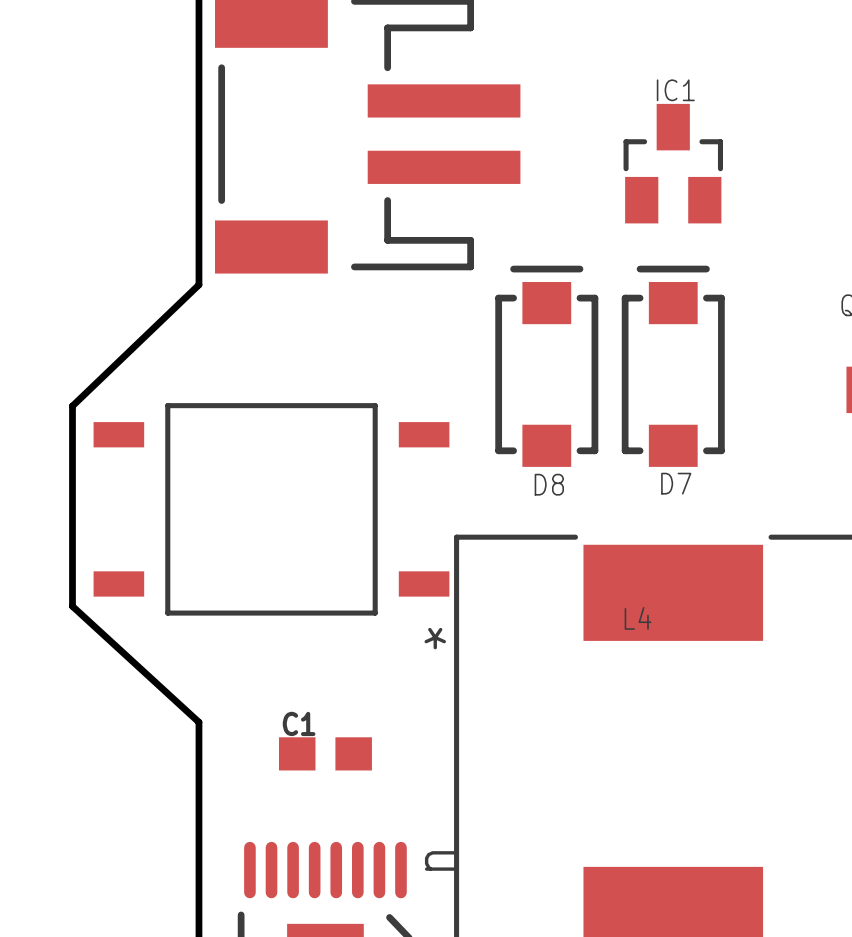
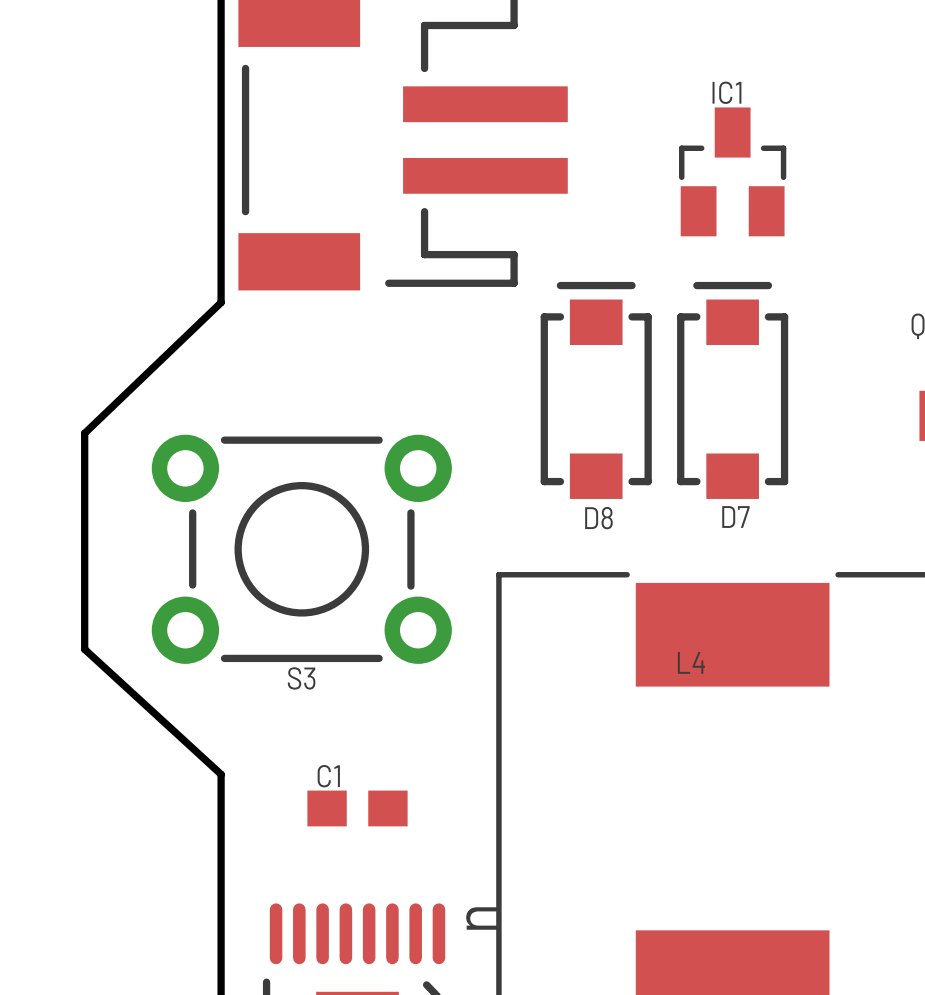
part: (271, 509) -> none
S3: none -> (301, 549)

